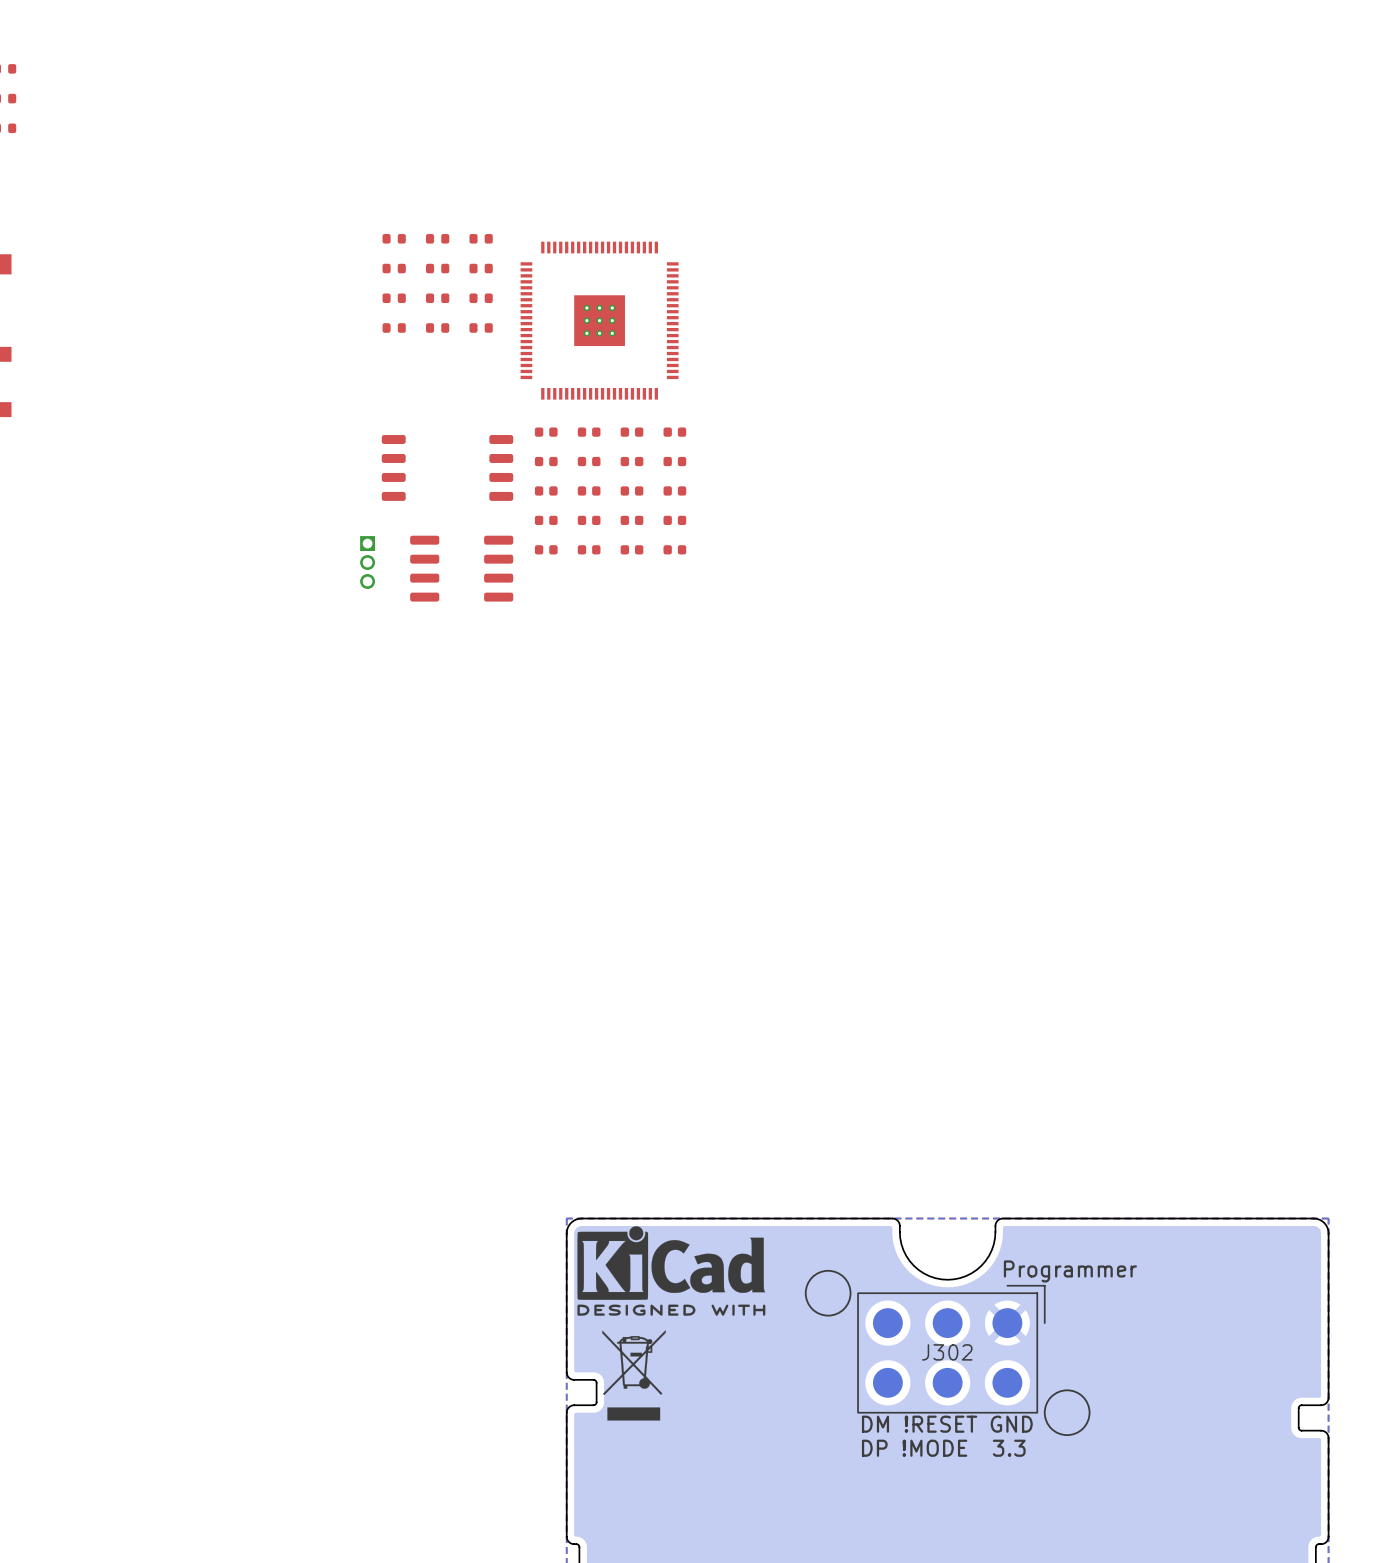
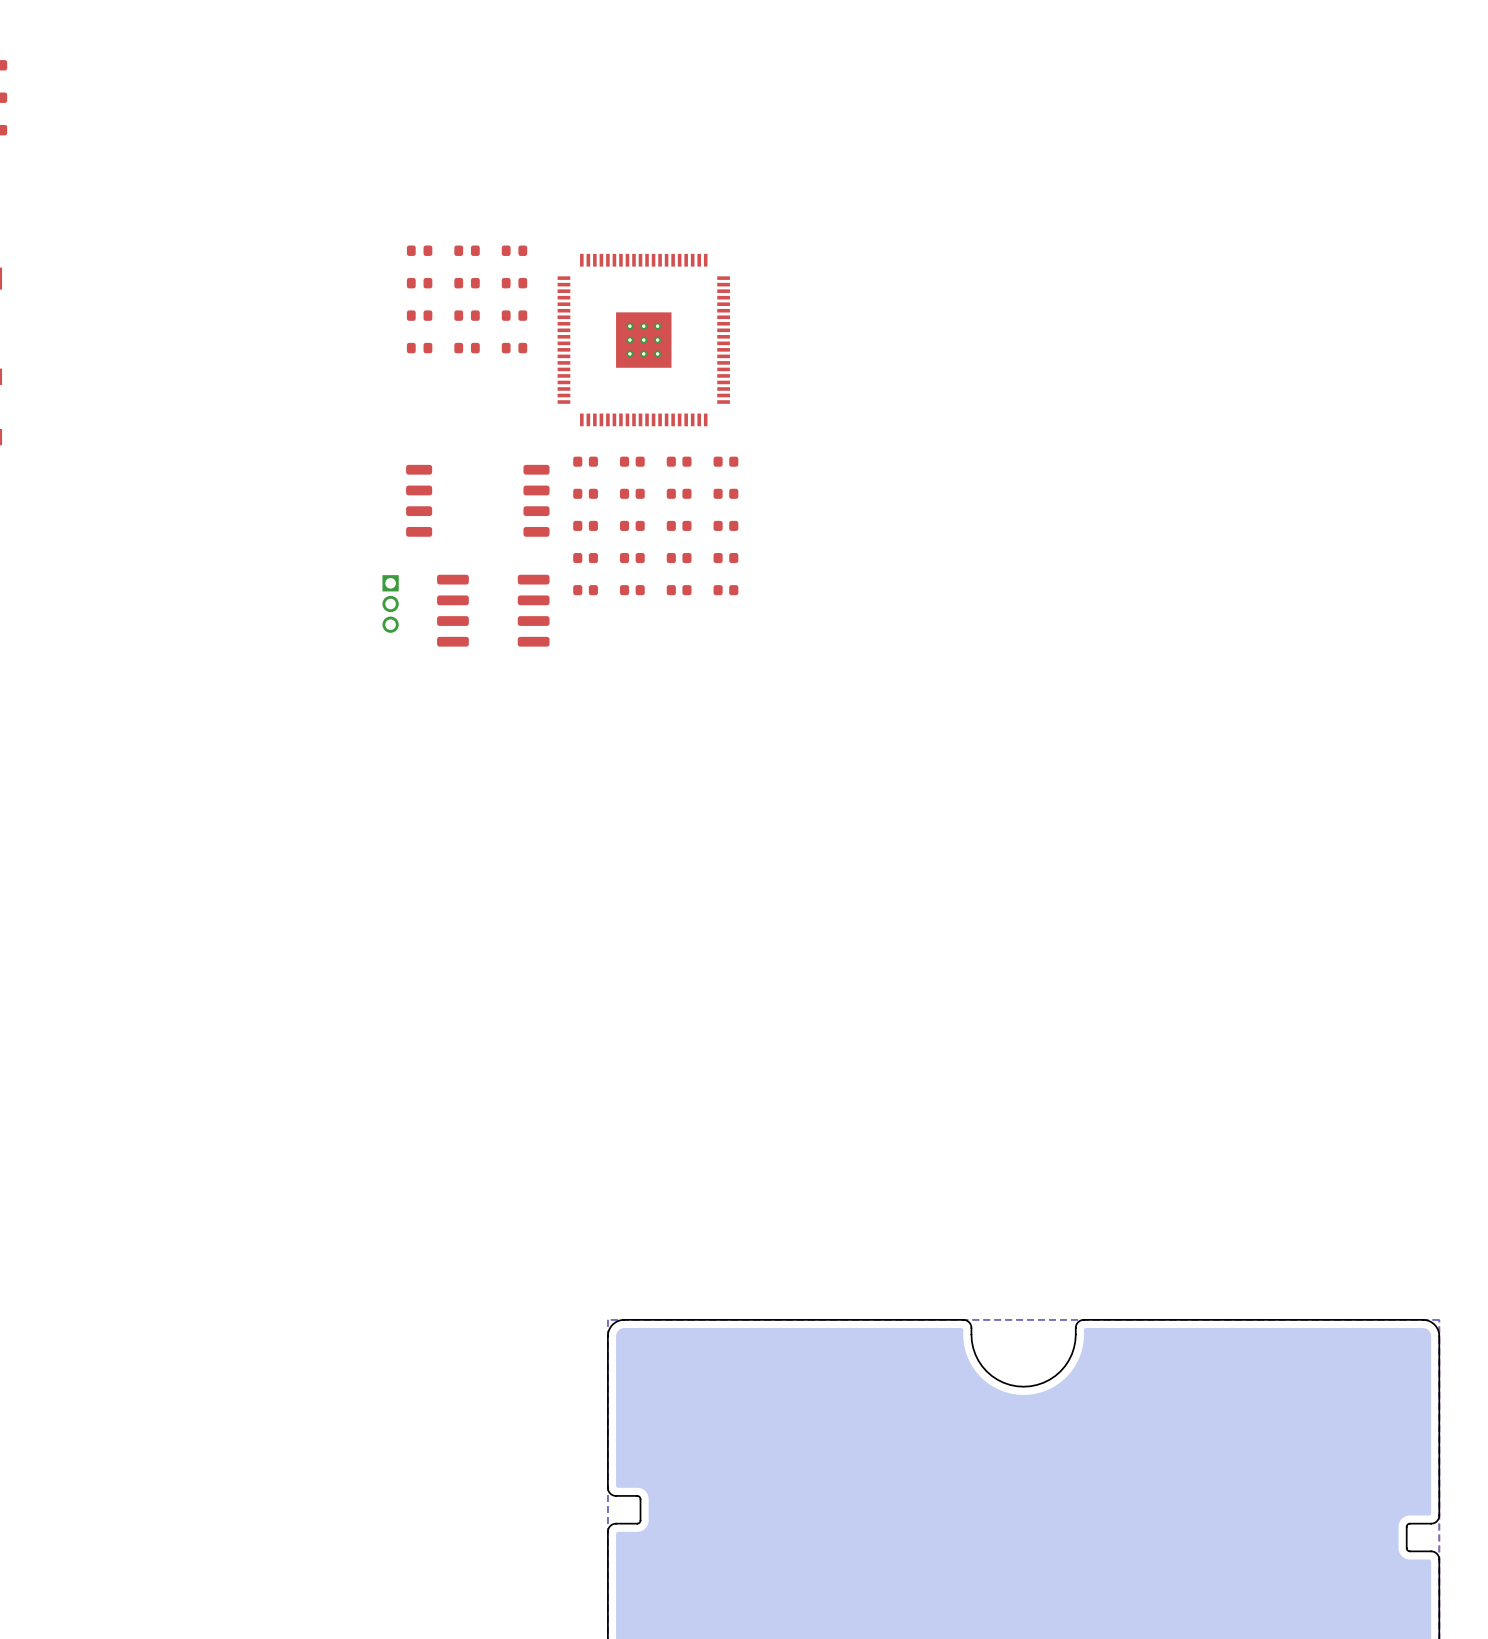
drawing: [577, 1226, 766, 1421] -> none
drawing: [804, 1269, 852, 1317] -> none
text: Programmer (1070, 1271) -> none
J302: (951, 1349) -> none
drawing: [1043, 1389, 1091, 1437] -> none
text: DM !RESET GND (947, 1424) -> none
text: DP !MODE 3.3 (943, 1448) -> none

